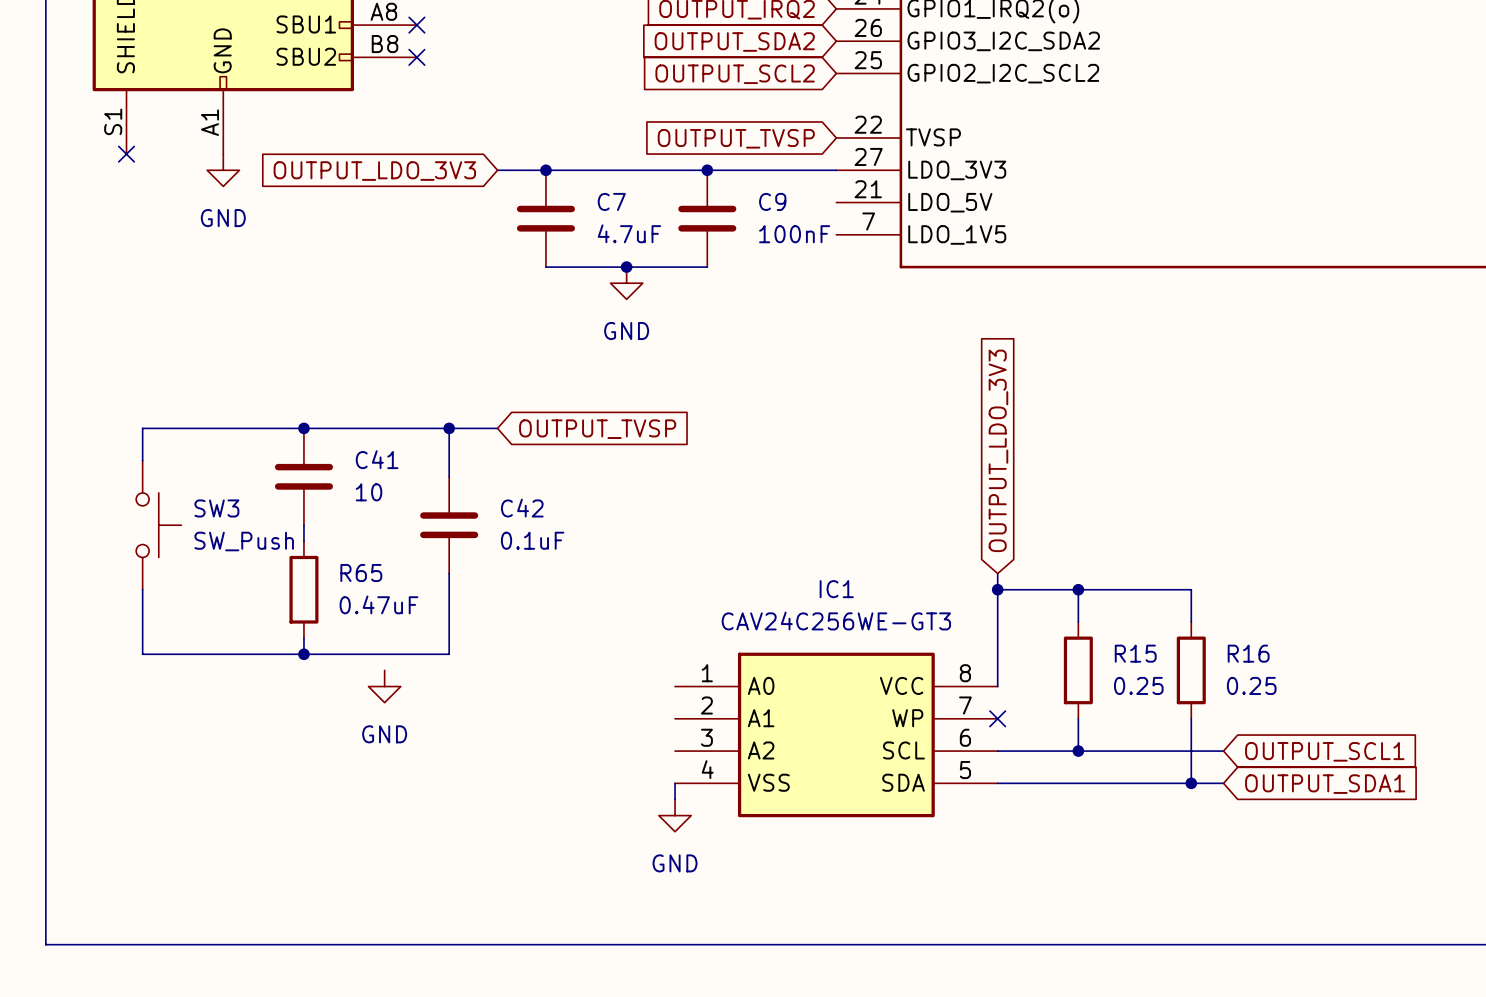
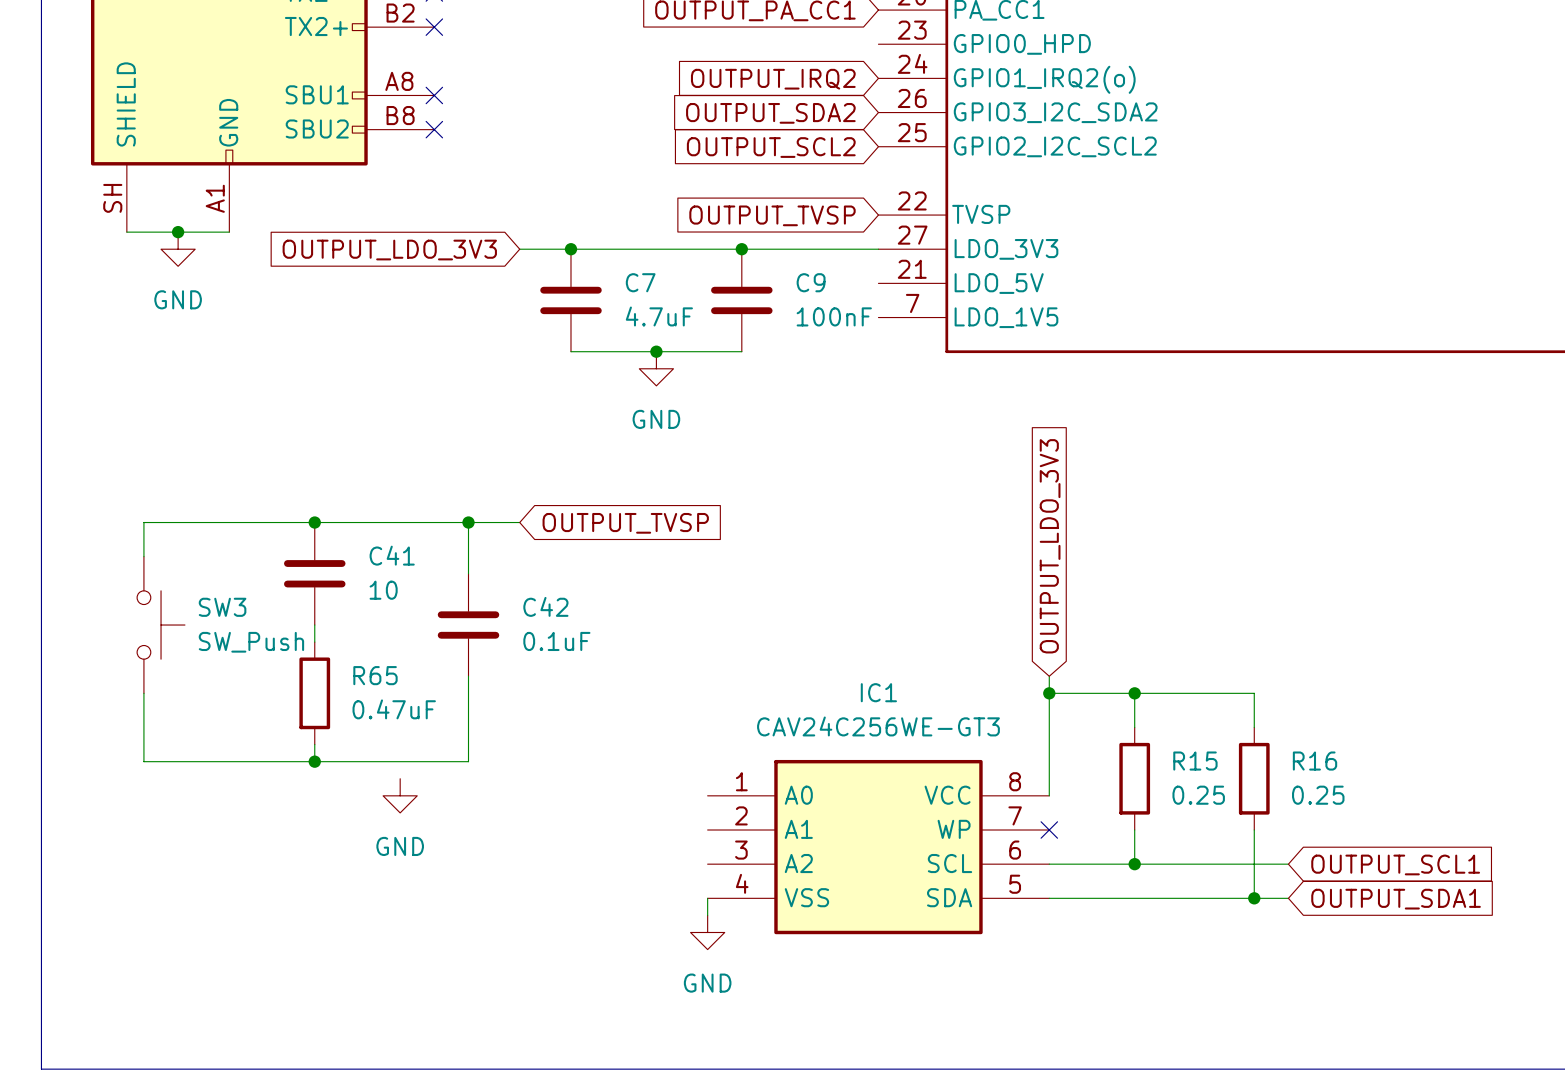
part pin number: S1 (113, 121) -> SH (112, 198)
wire: none -> (126, 232) (229, 232)
no-connect mark: (126, 154) -> none
junction: none -> (178, 232)
power symbol position: GND (223, 170) -> GND (178, 249)

